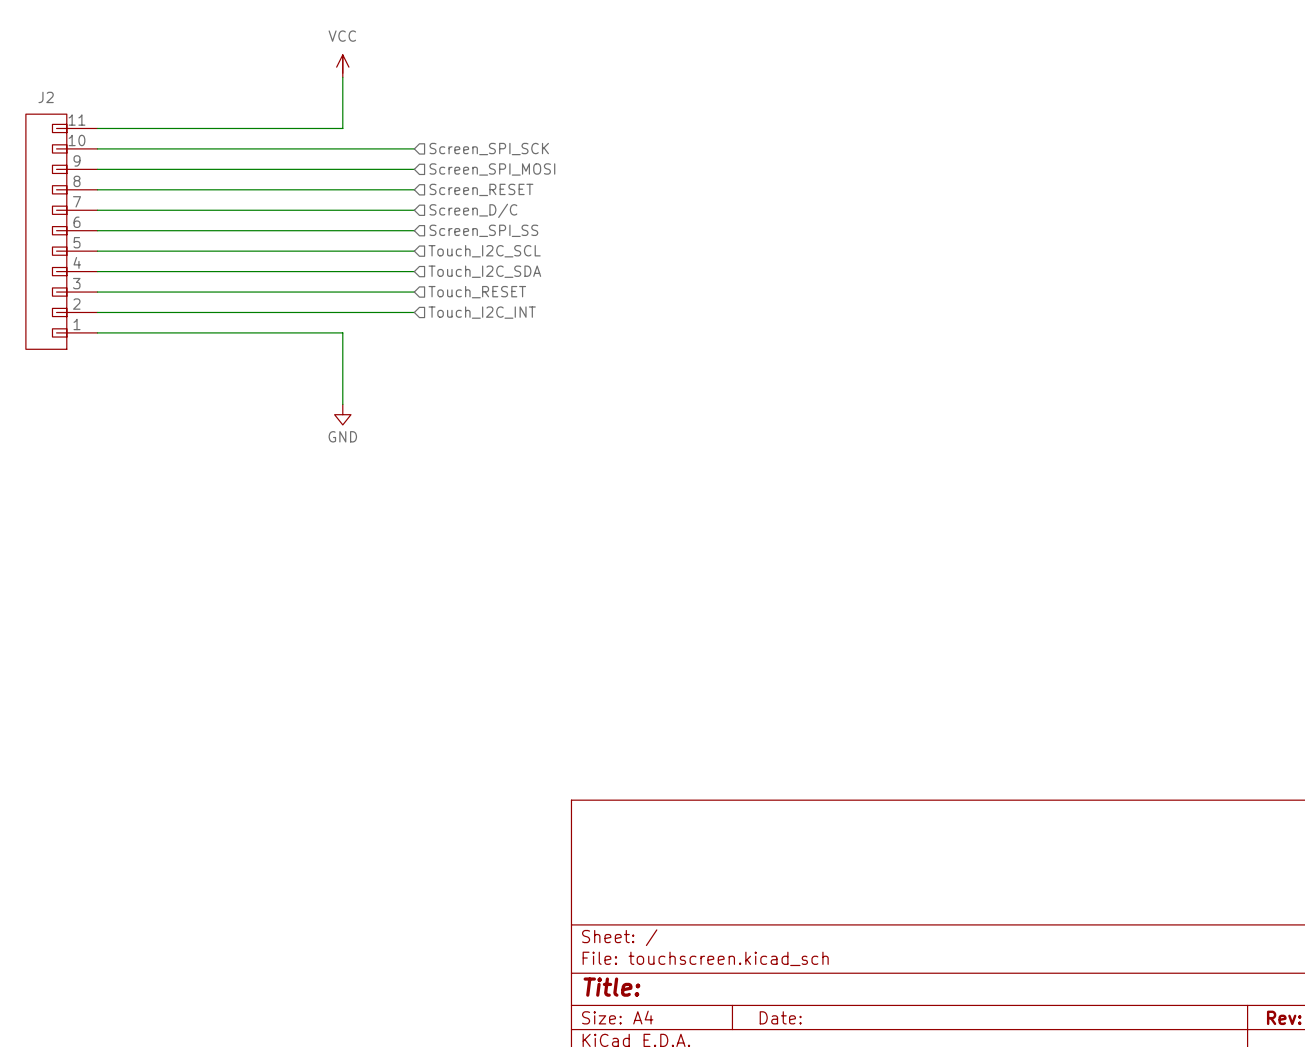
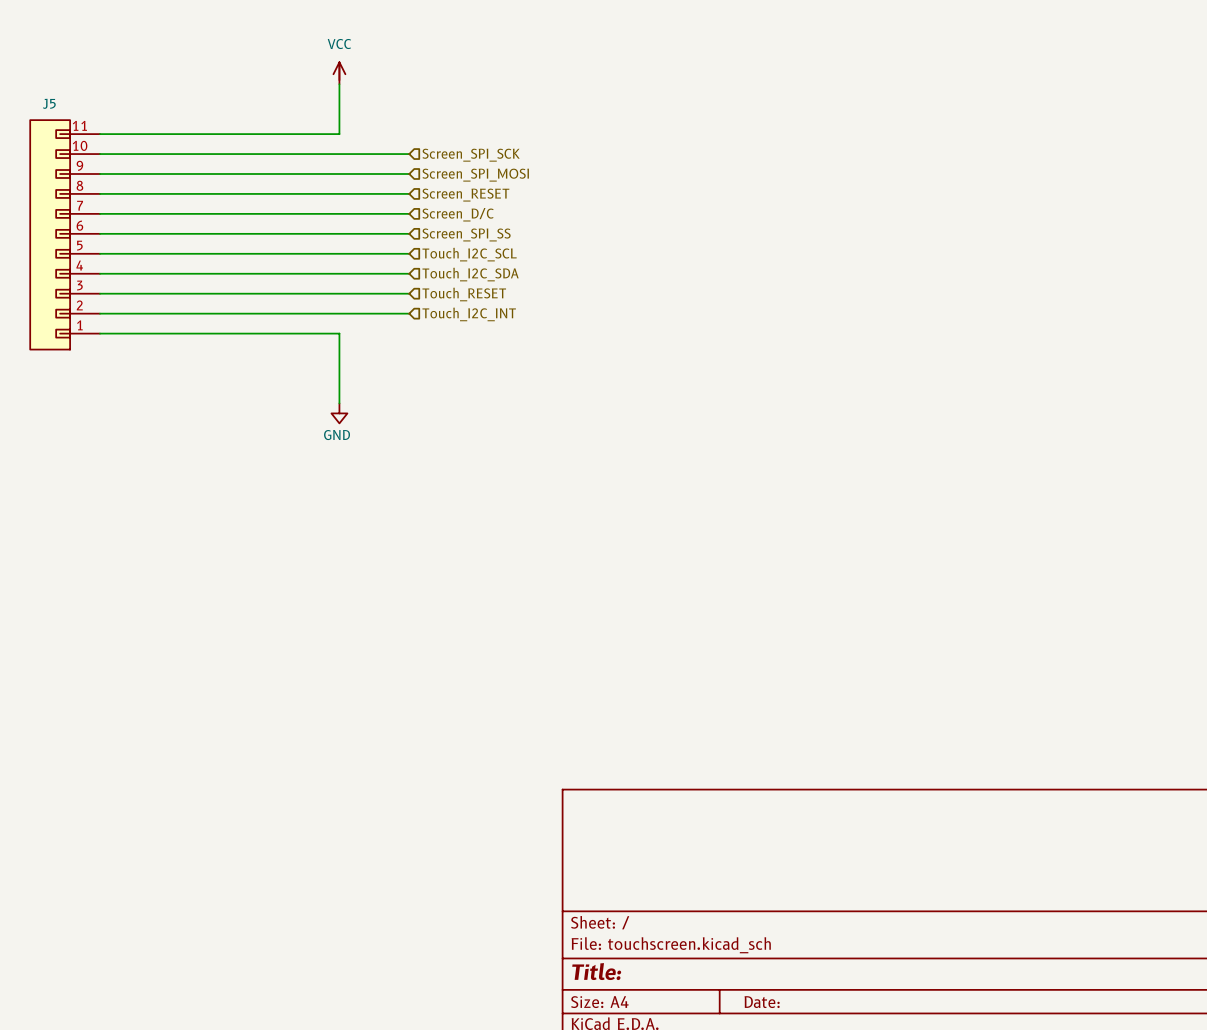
J2 name: J2 (46, 97) -> J5 (49, 103)

